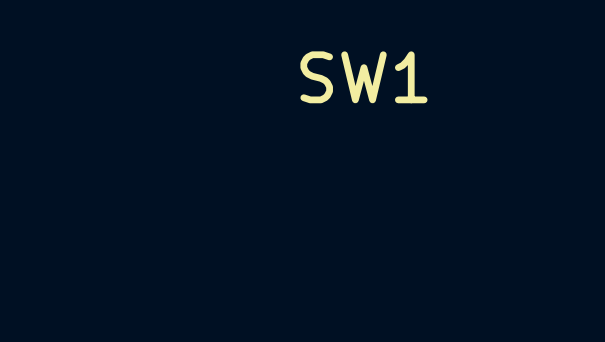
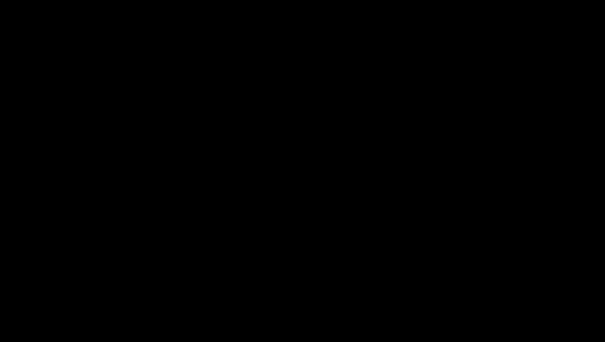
SW1 name: SW1 (363, 77) -> none

